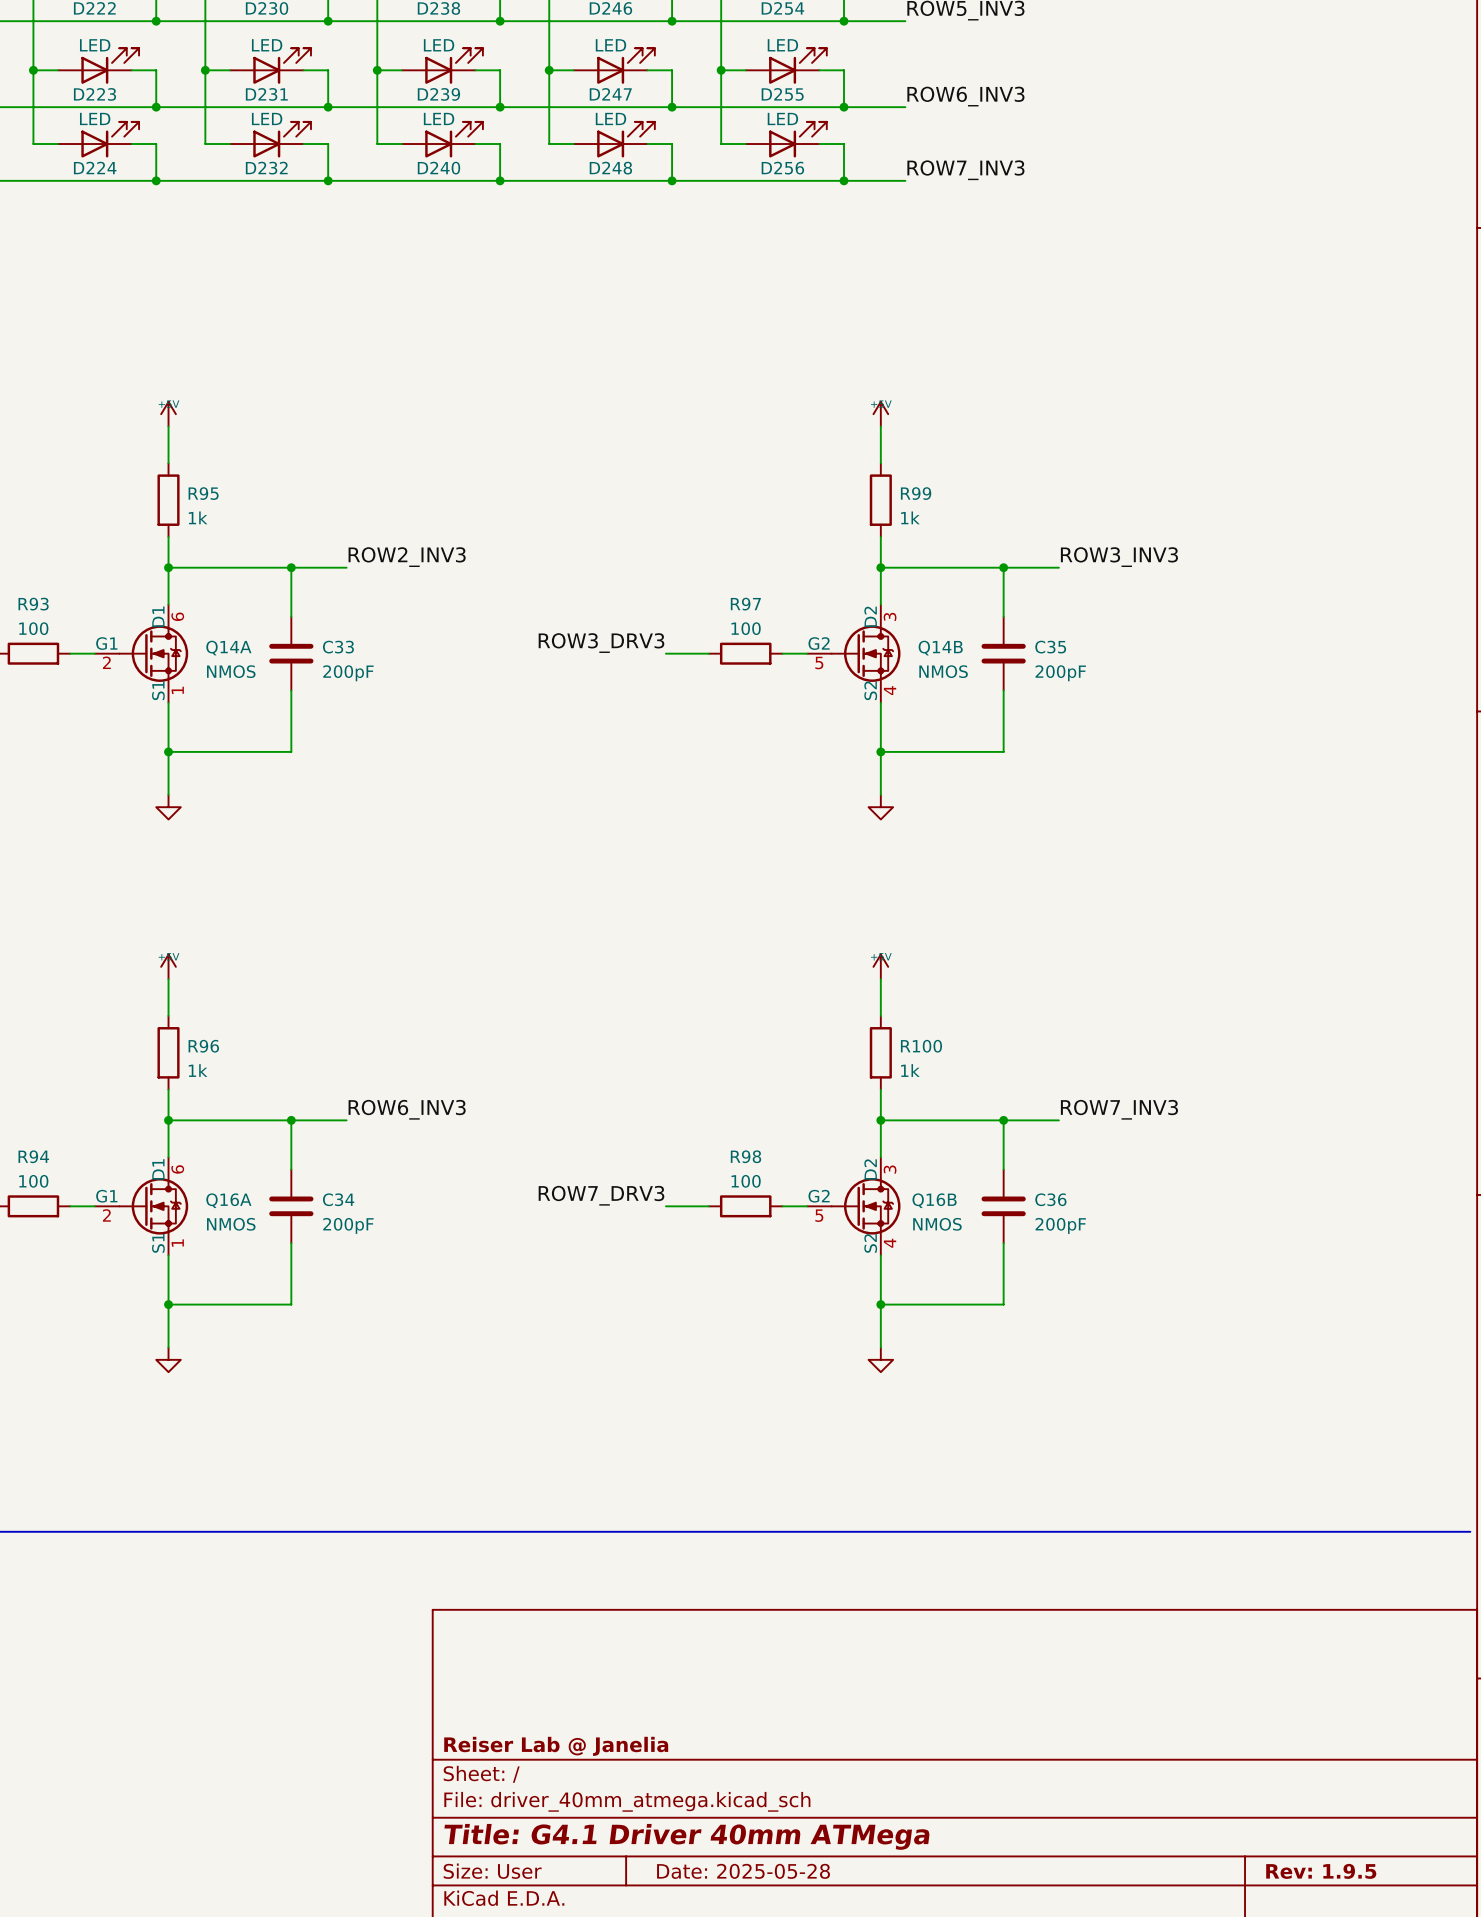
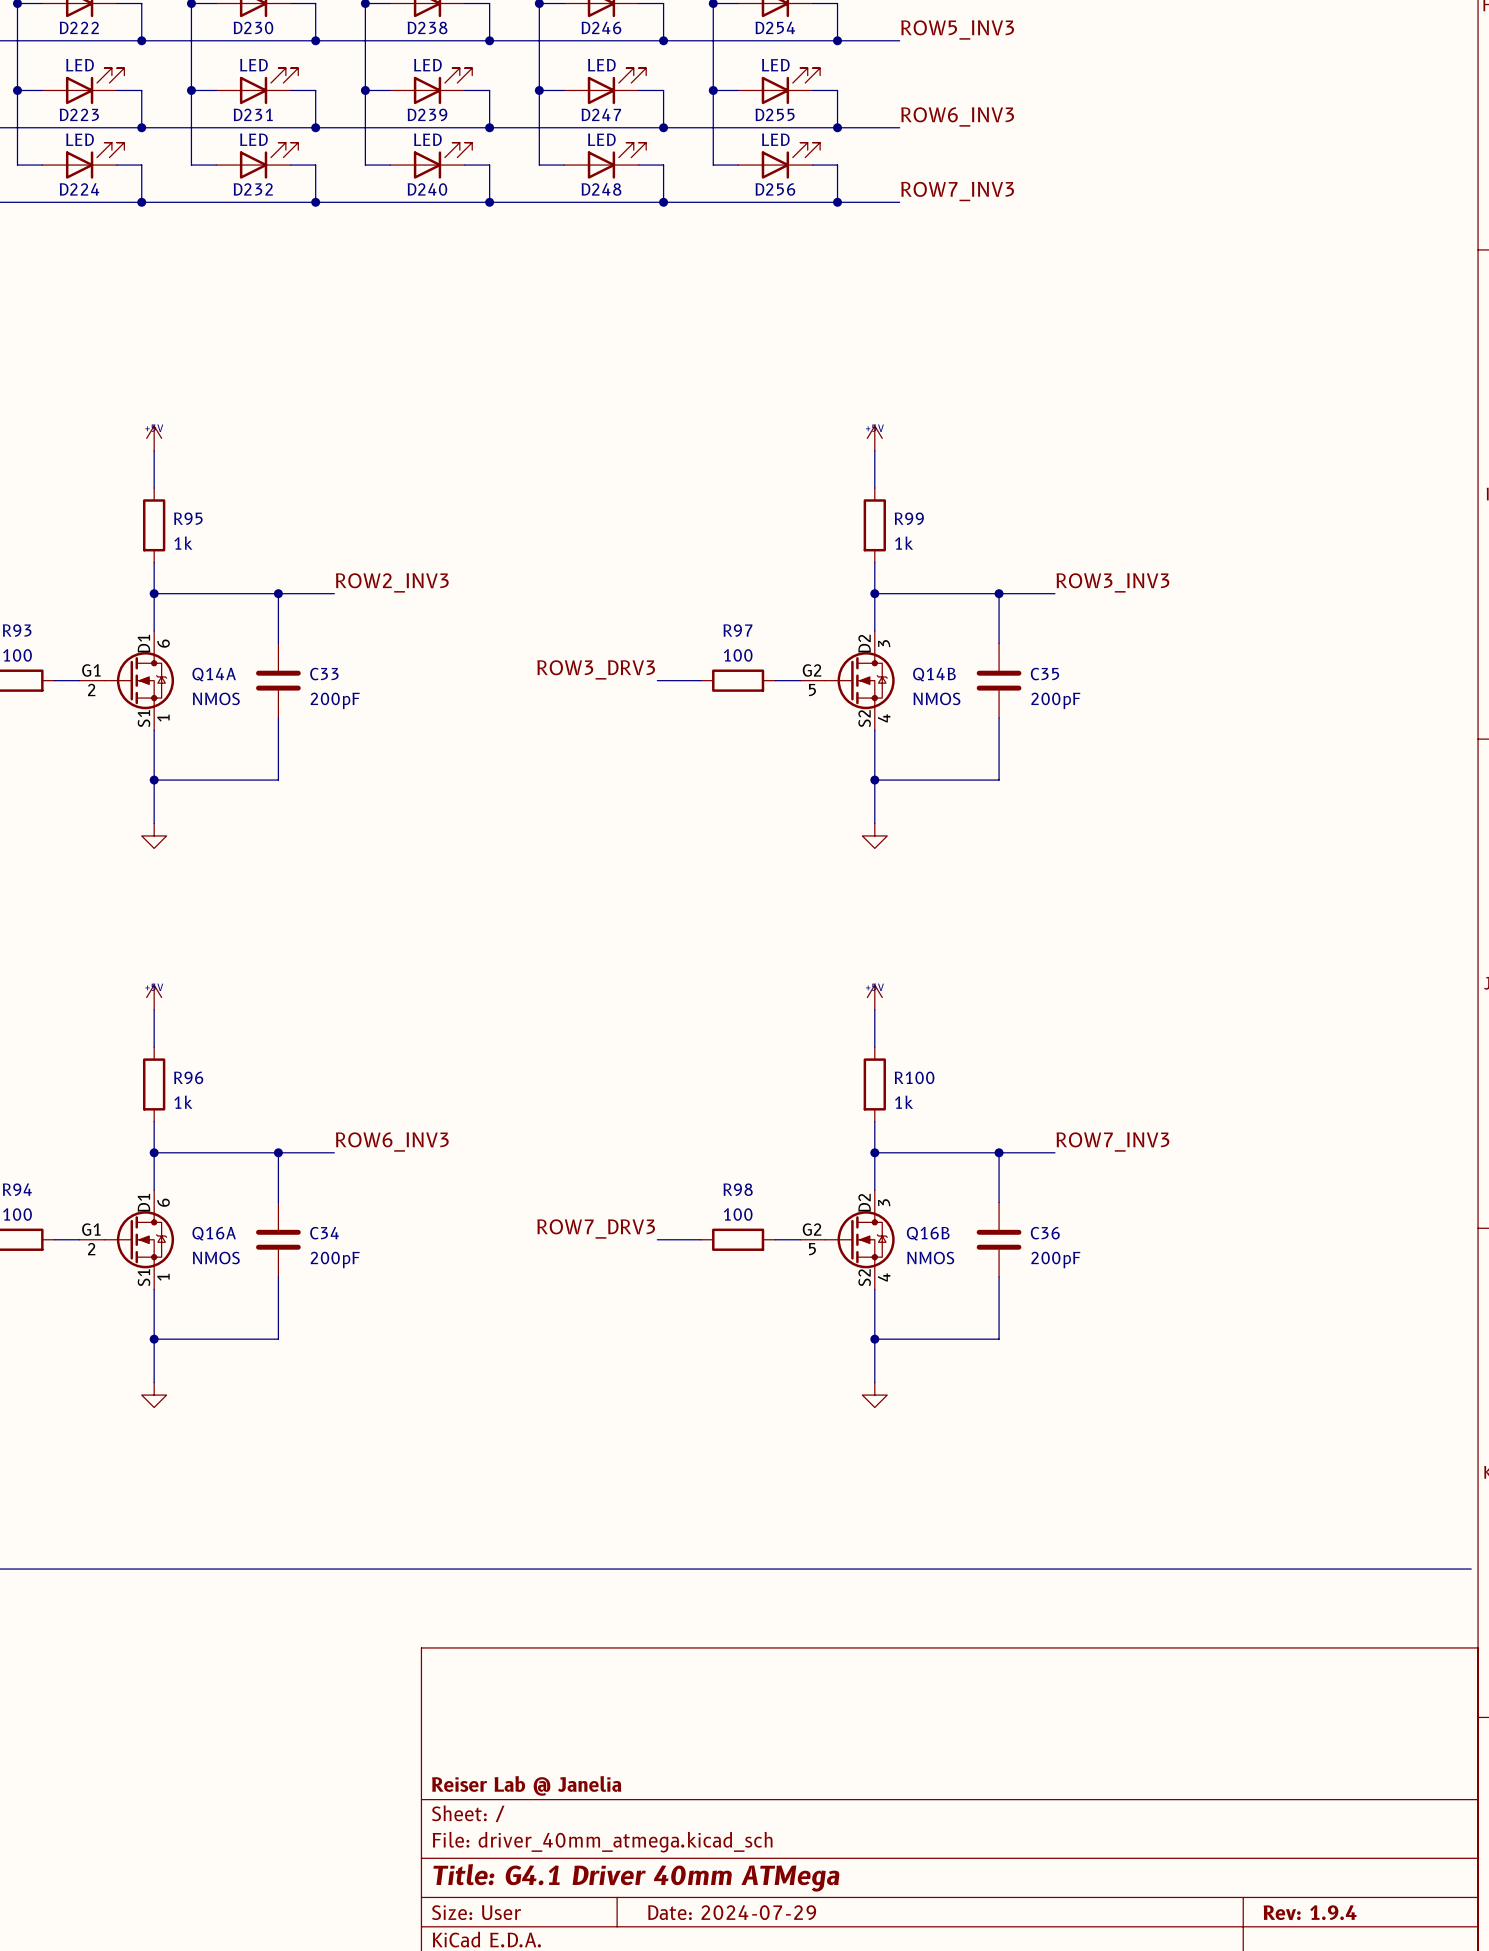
title block: Date: 2025-05-28 (743, 1871) -> Date: 2024-07-29 (732, 1912)
title block: Rev: 1.9.5 (1321, 1871) -> Rev: 1.9.4 (1310, 1912)

